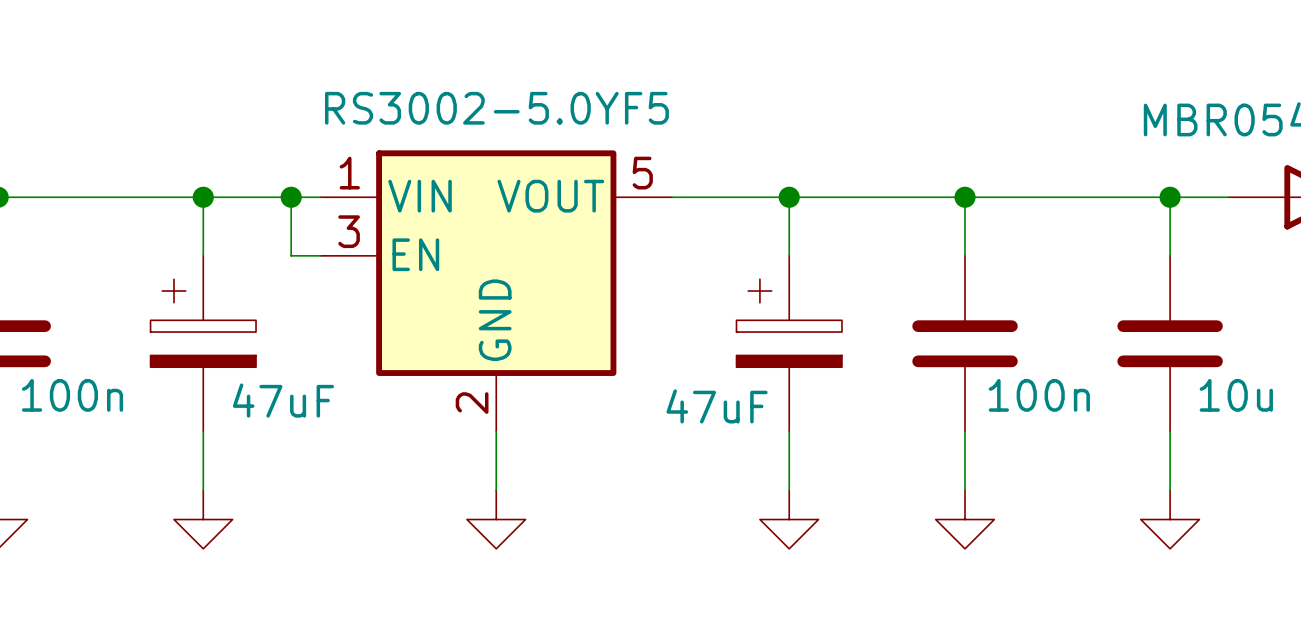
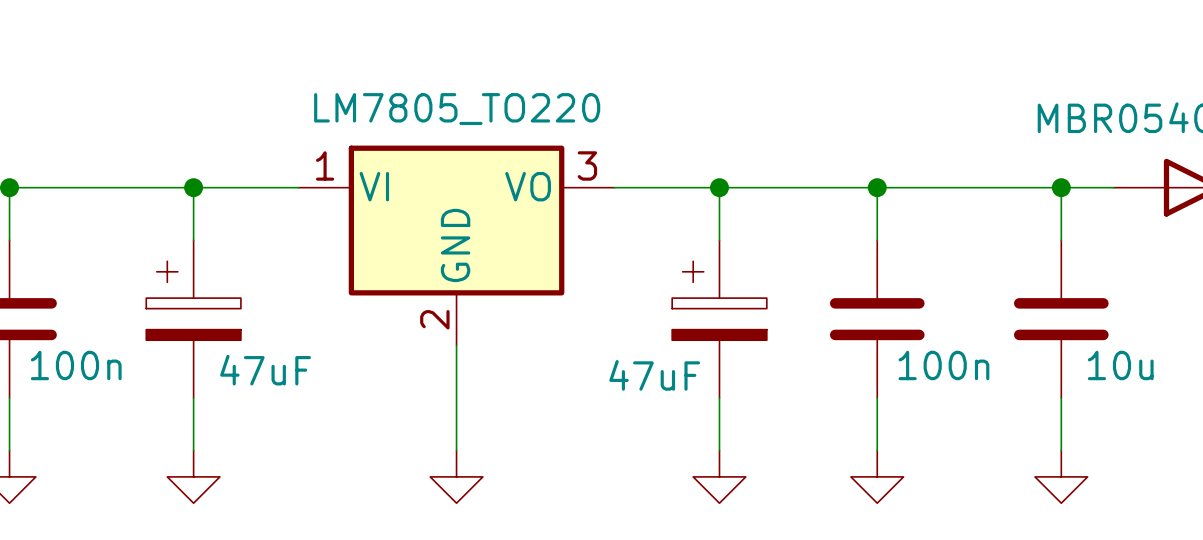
wire: (291, 197) (291, 255) (320, 255) -> none
junction: (291, 197) -> none
part: none -> LM7805_TO220 (456, 245)
part: RS3002-5.0YF5 (496, 291) -> none

